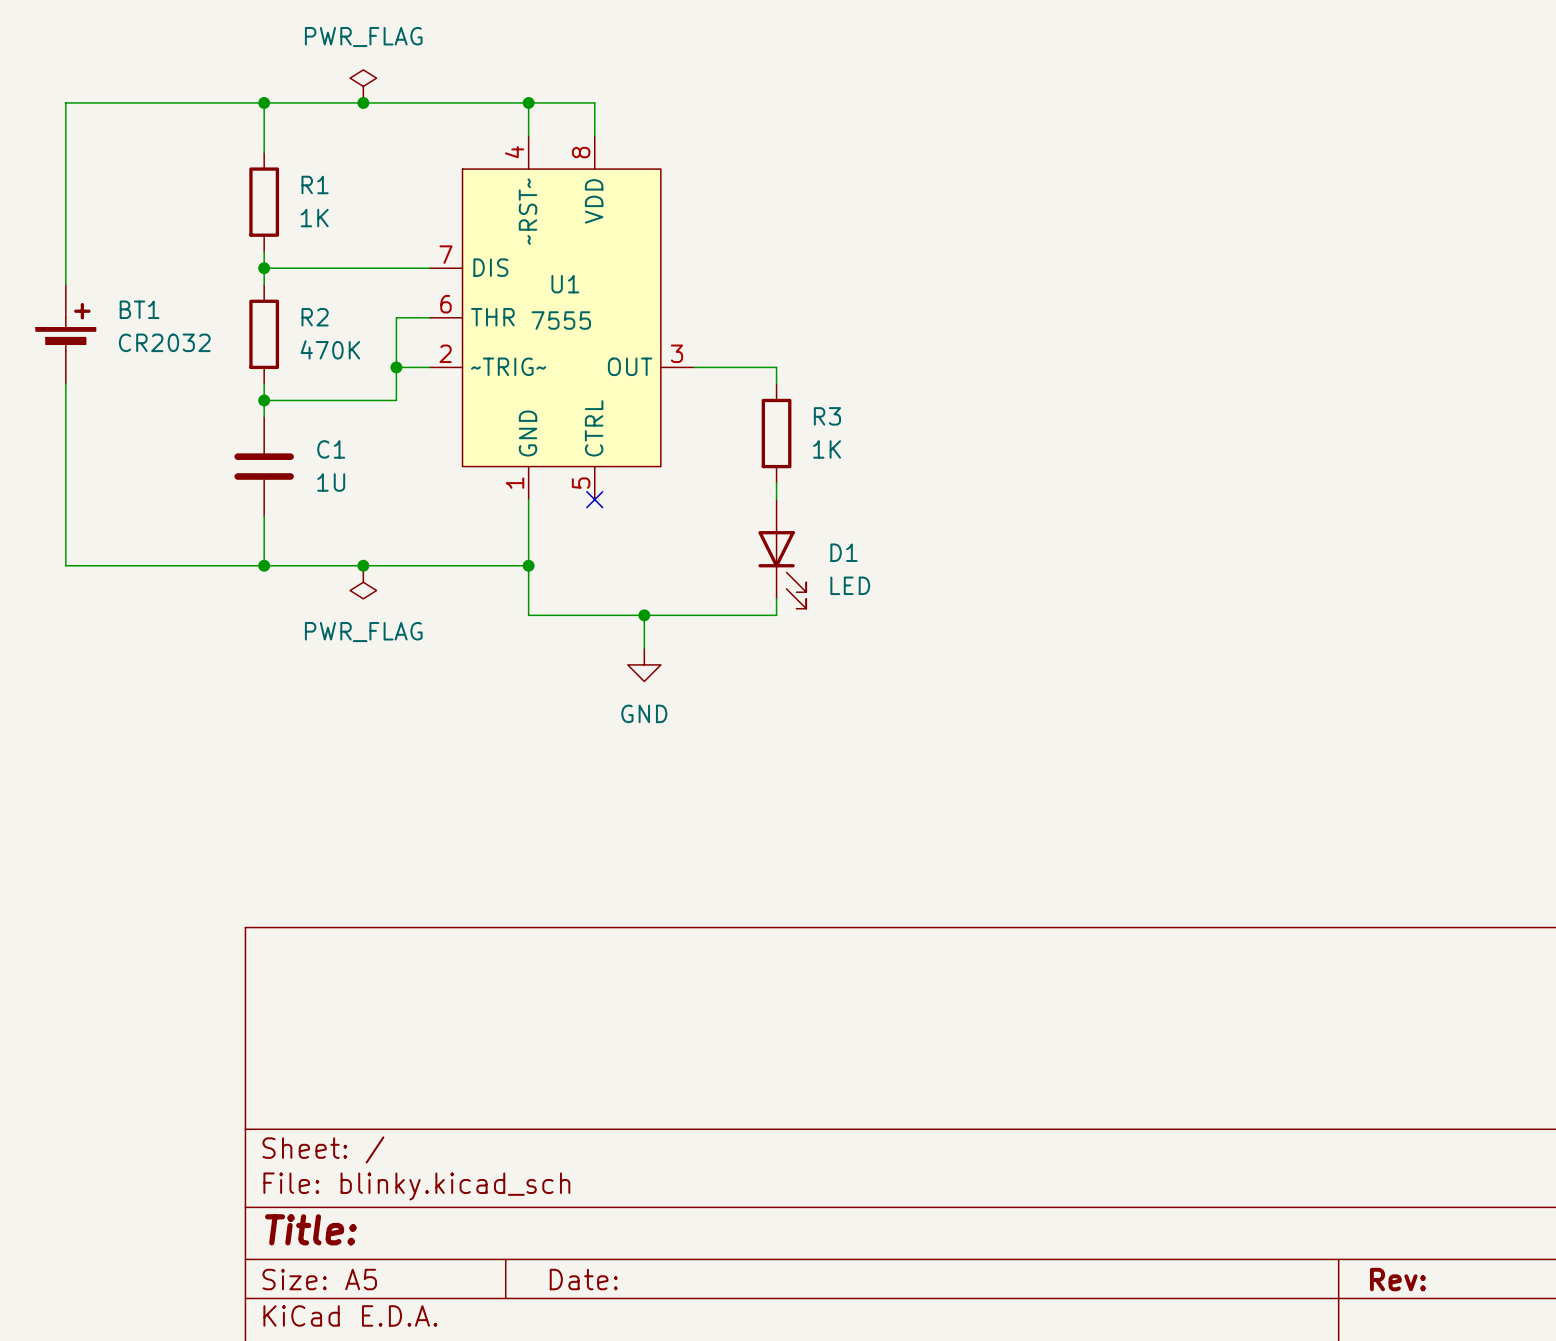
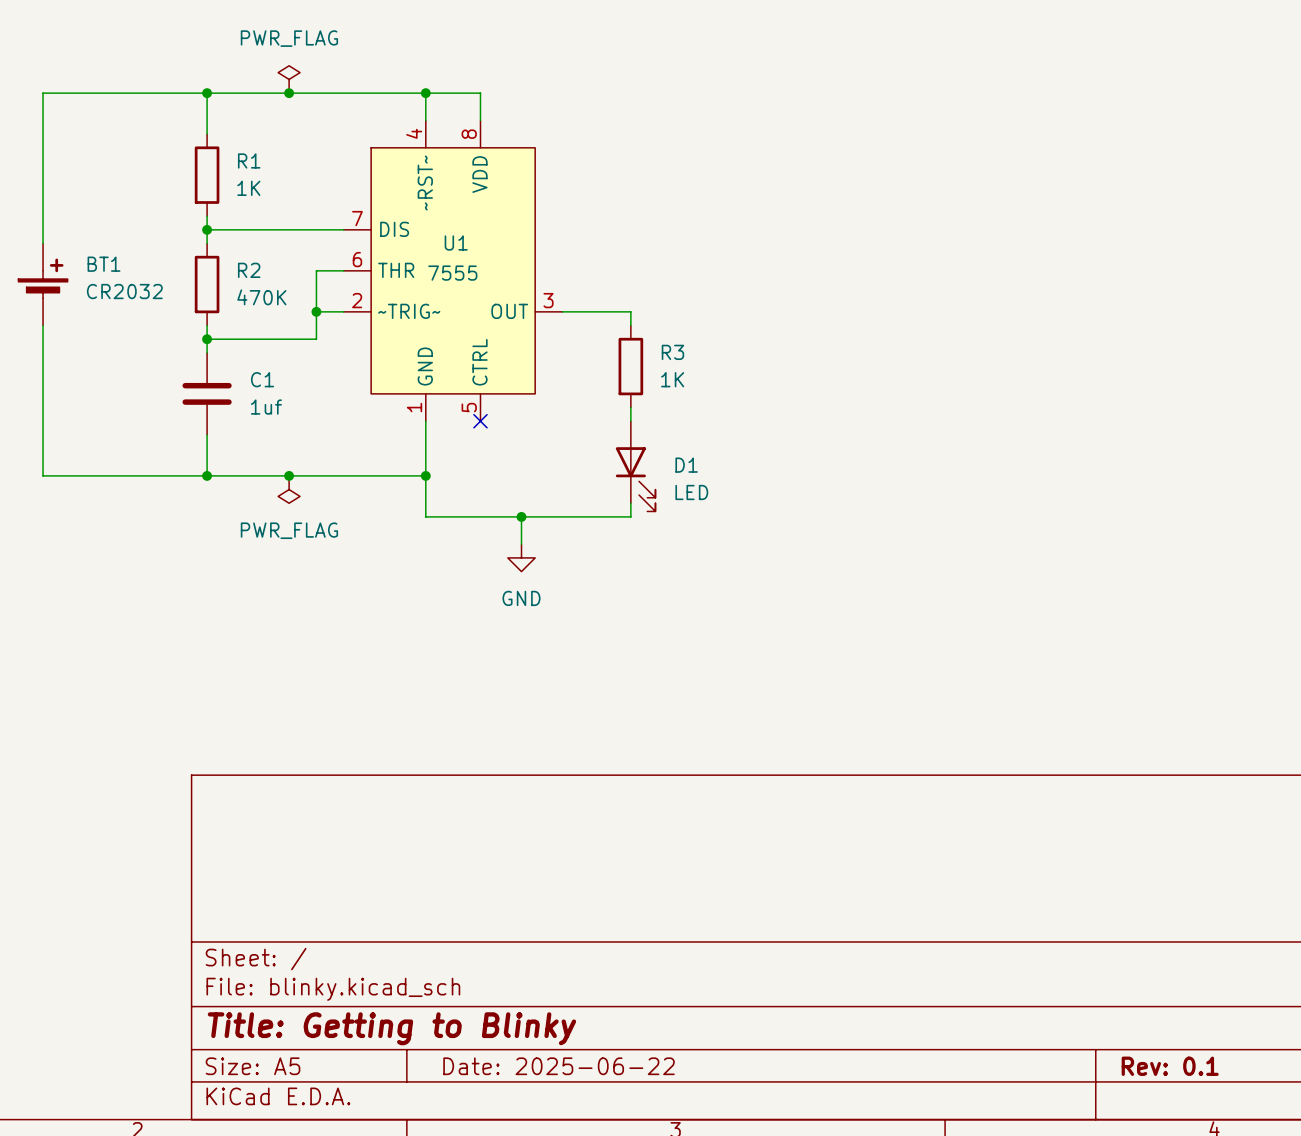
C1 value: 1U (331, 482) -> 1uf (266, 407)
title block: Title: (310, 1229) -> Title: Getting to Blinky (391, 1028)
title block: Date: (583, 1279) -> Date: 2025-06-22 (559, 1066)
title block: Rev: (1397, 1279) -> Rev: 0.1 (1170, 1066)

